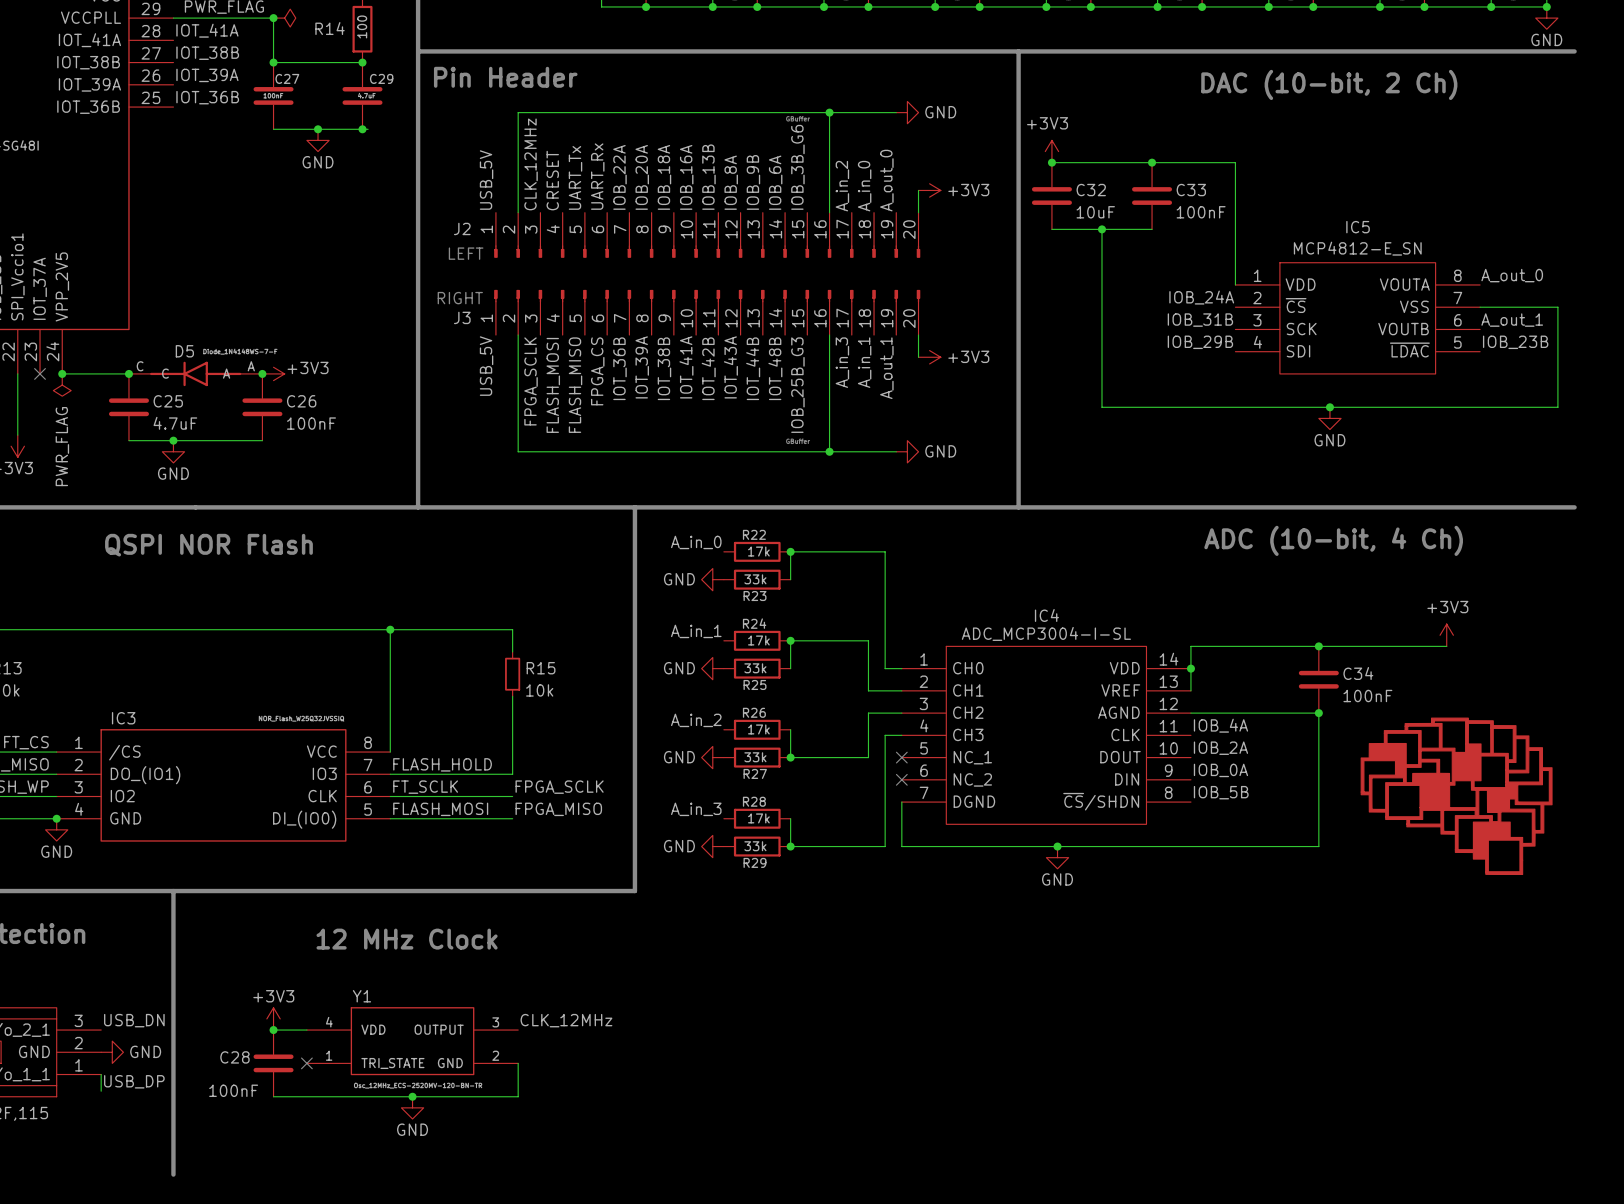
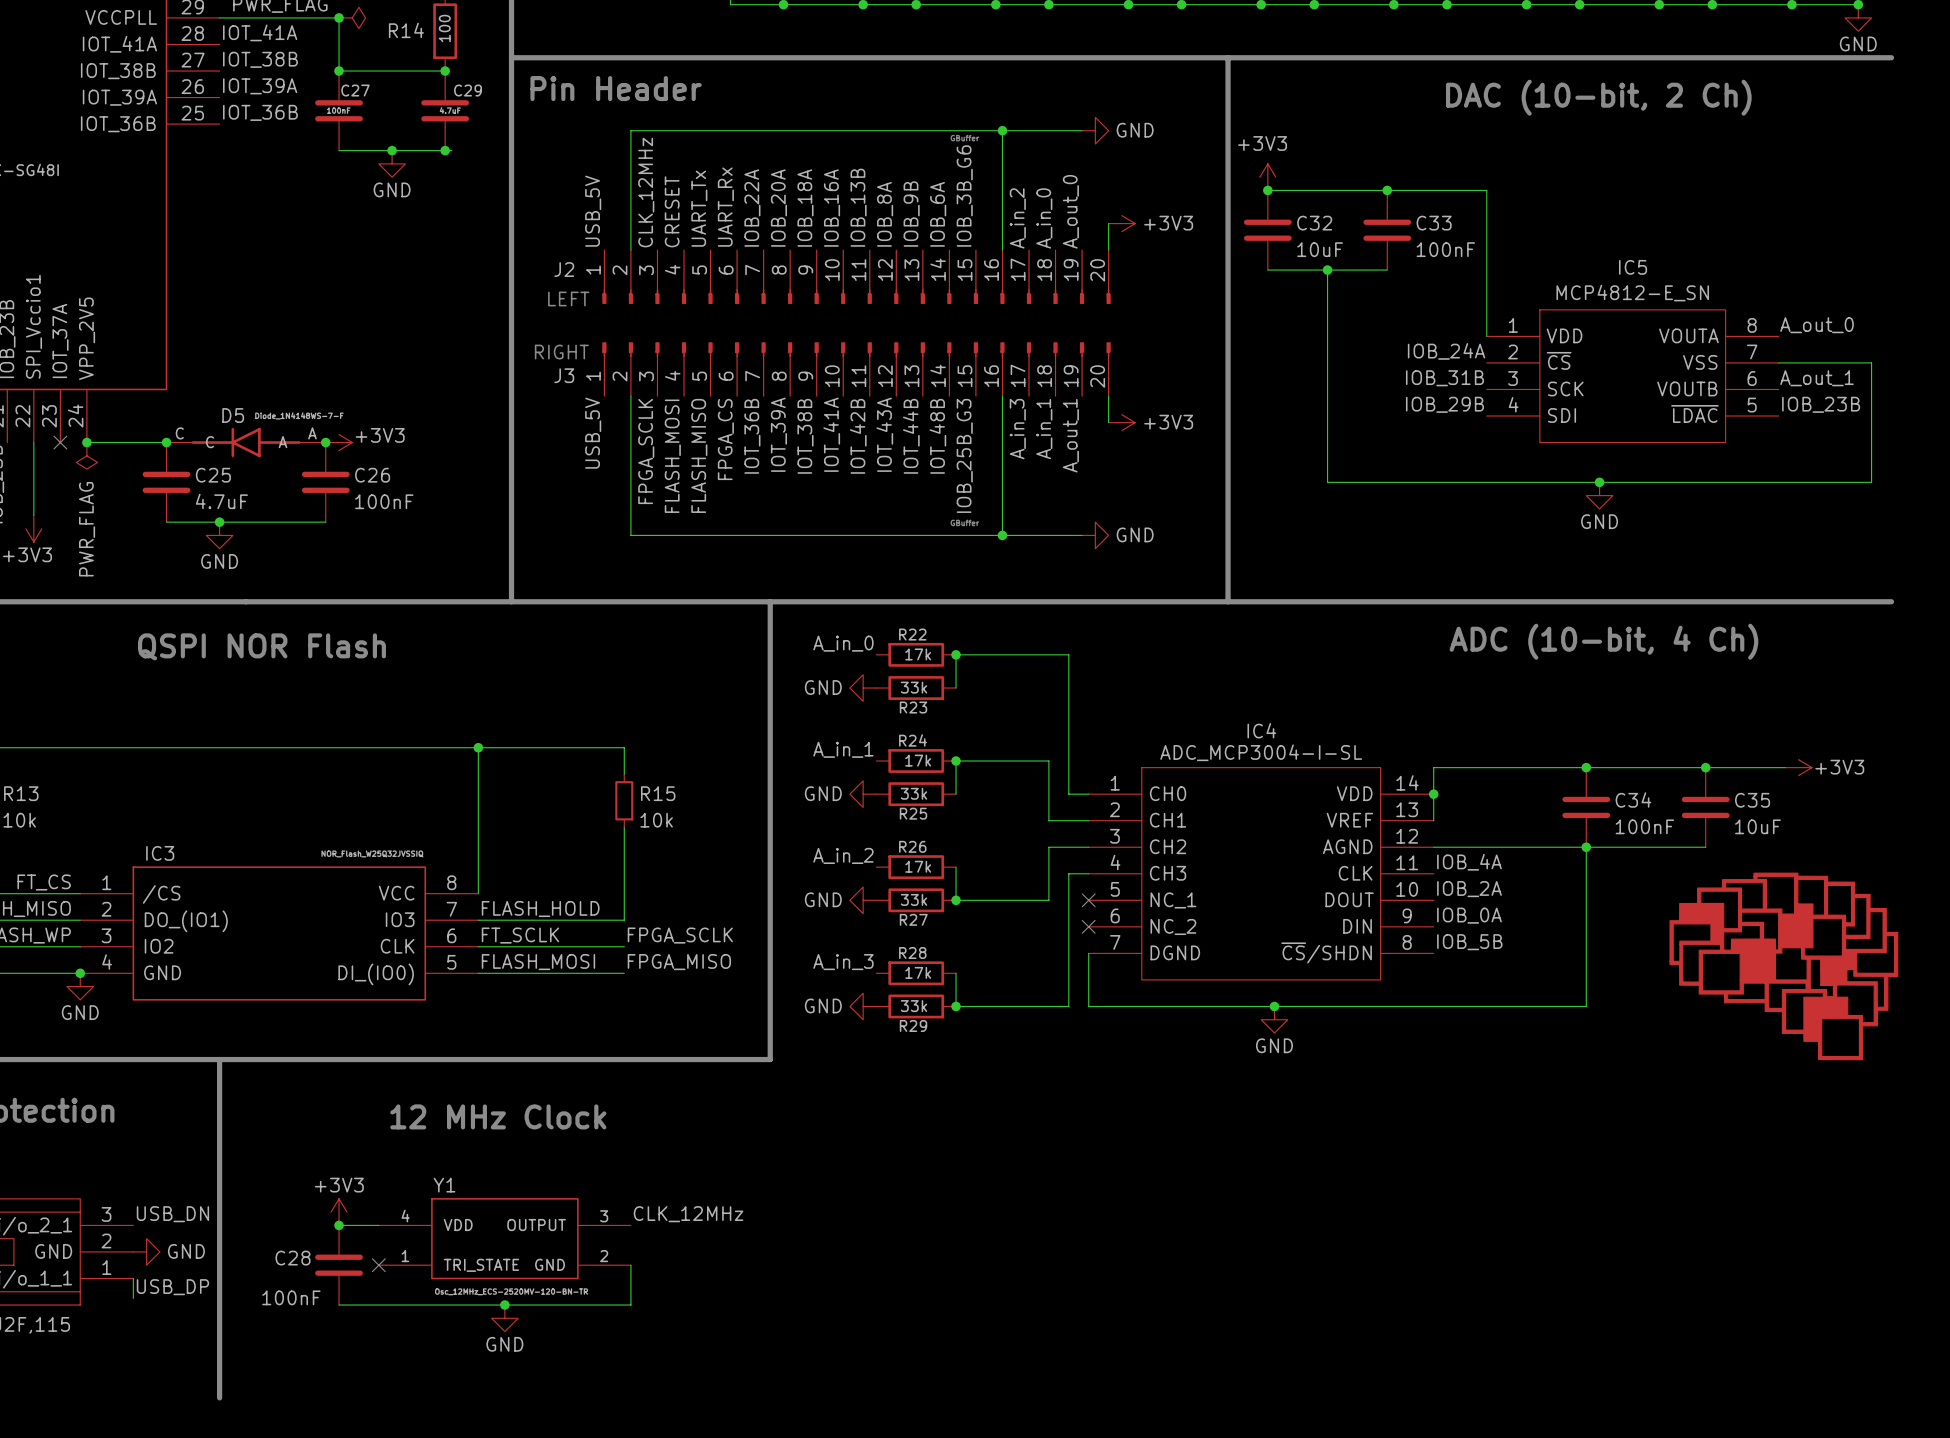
power symbol rotation: 0° (1446, 635) -> 90° clockwise (1798, 767)
power symbol position: +3V3 (1446, 635) -> +3V3 (1798, 767)
junction: none -> (1705, 767)
wire: none -> (1738, 767) (1785, 767)
C35: none -> 10uF (1705, 807)
wire: none -> (1586, 847) (1705, 847)
part position: (1456, 796) -> (1783, 966)

